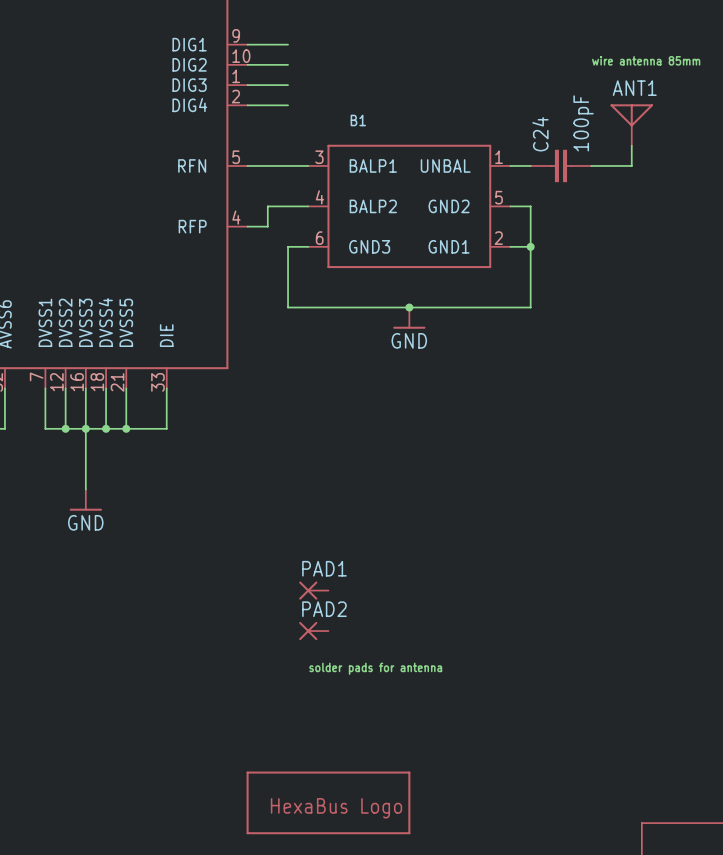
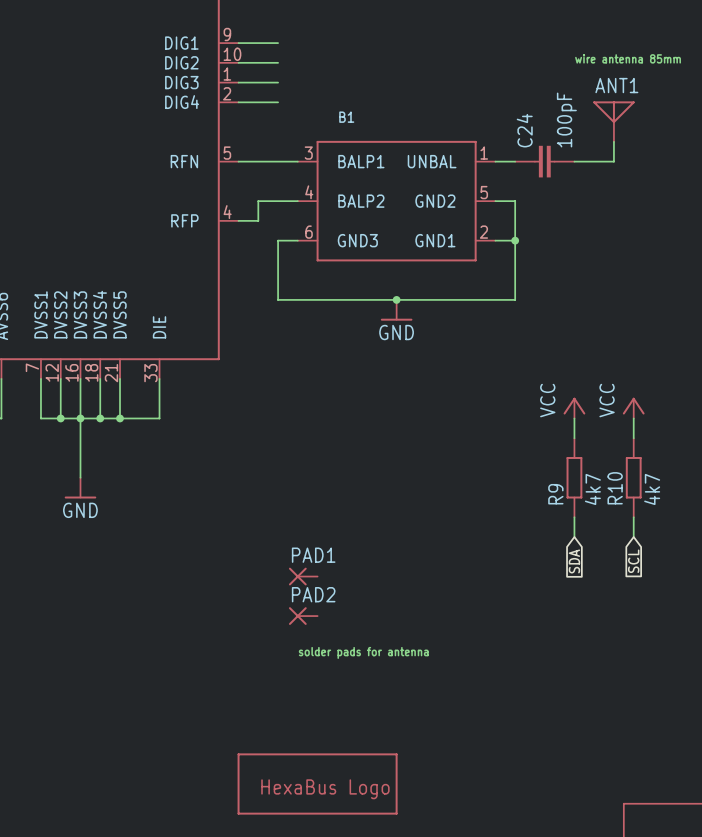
power symbol: none -> VCC (574, 408)
power symbol: none -> VCC (633, 408)
wire: none -> (574, 418) (574, 438)
wire: none -> (633, 418) (633, 438)
R9: none -> 4k7 (574, 477)
R10: none -> 4k7 (633, 477)
wire: none -> (574, 517) (574, 537)
wire: none -> (633, 517) (633, 537)
global label: none -> SCL (633, 561)
global label: none -> SDA (574, 561)

